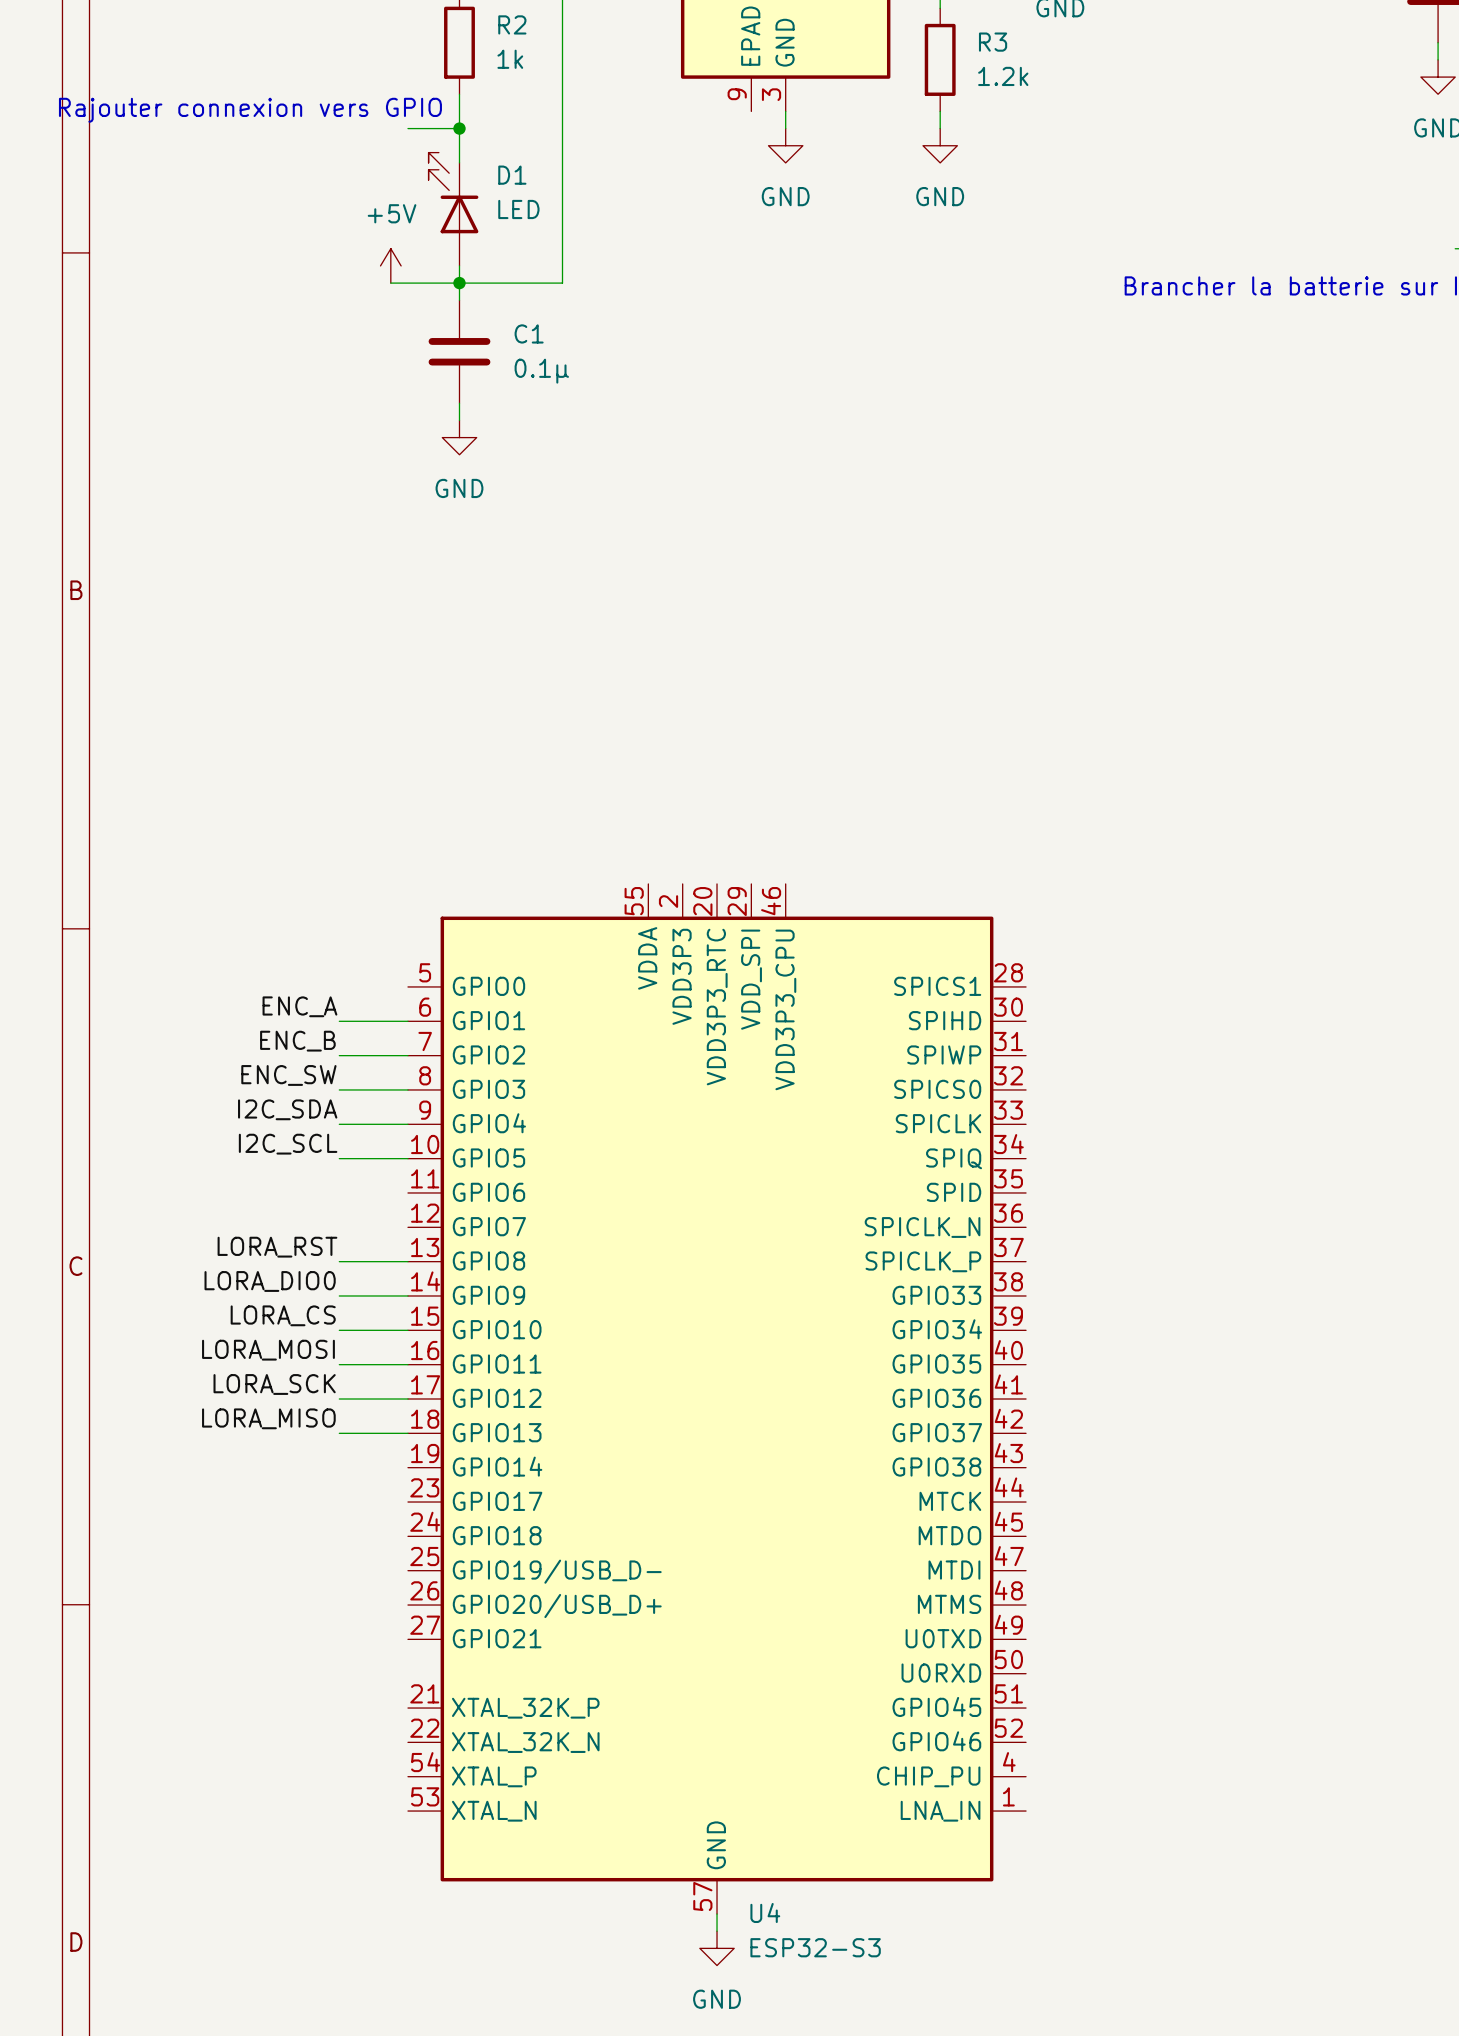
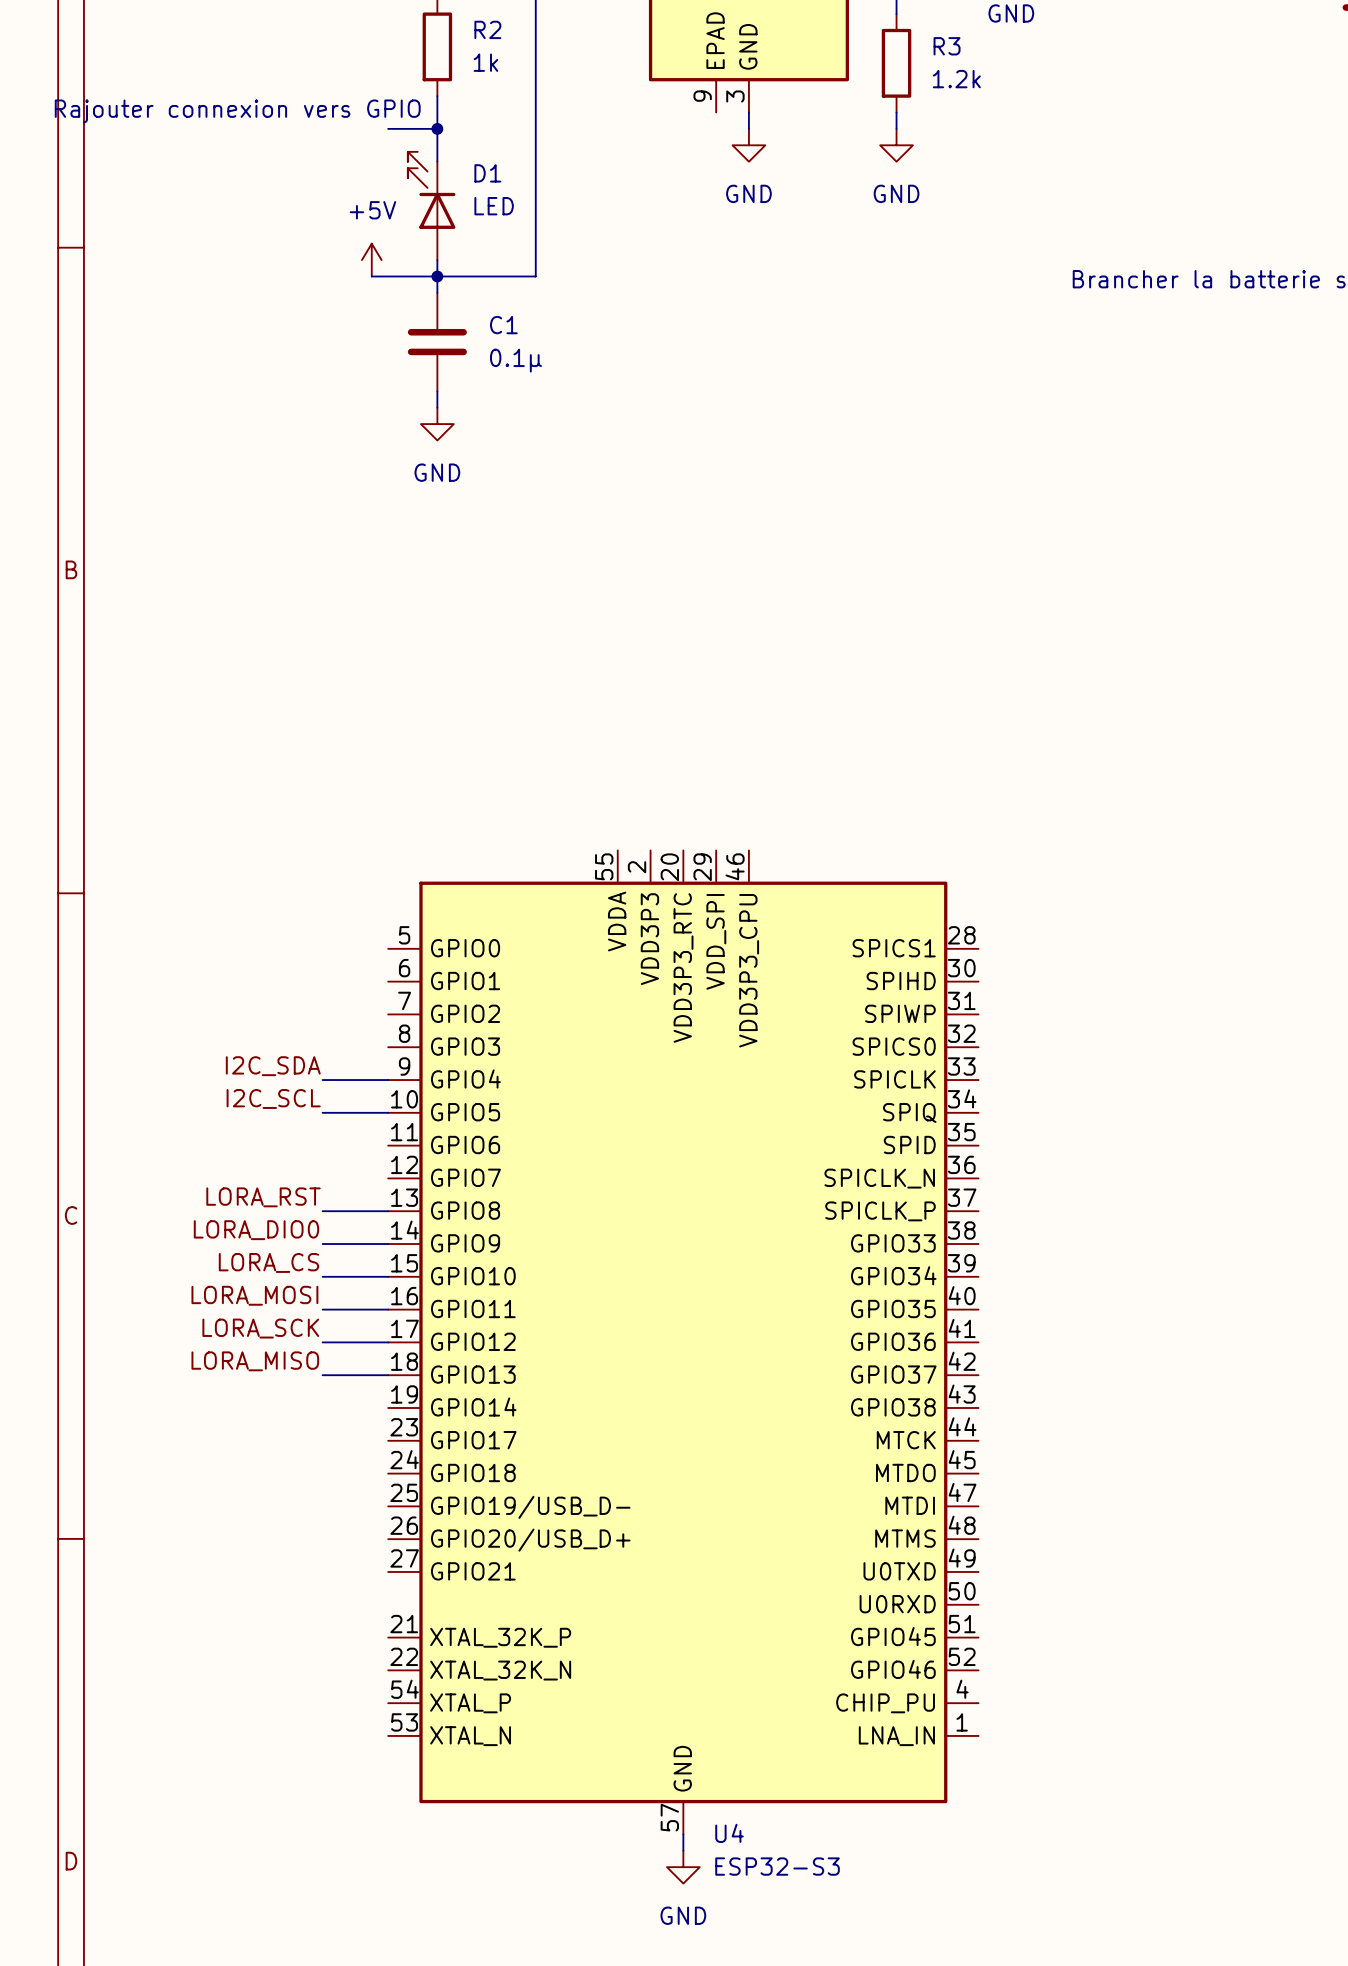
label: ENC_A (299, 1006) -> none
wire: (339, 1021) (407, 1021) -> none
label: ENC_B (297, 1041) -> none
wire: (339, 1055) (407, 1055) -> none
label: ENC_SW (288, 1075) -> none
wire: (339, 1089) (407, 1089) -> none

